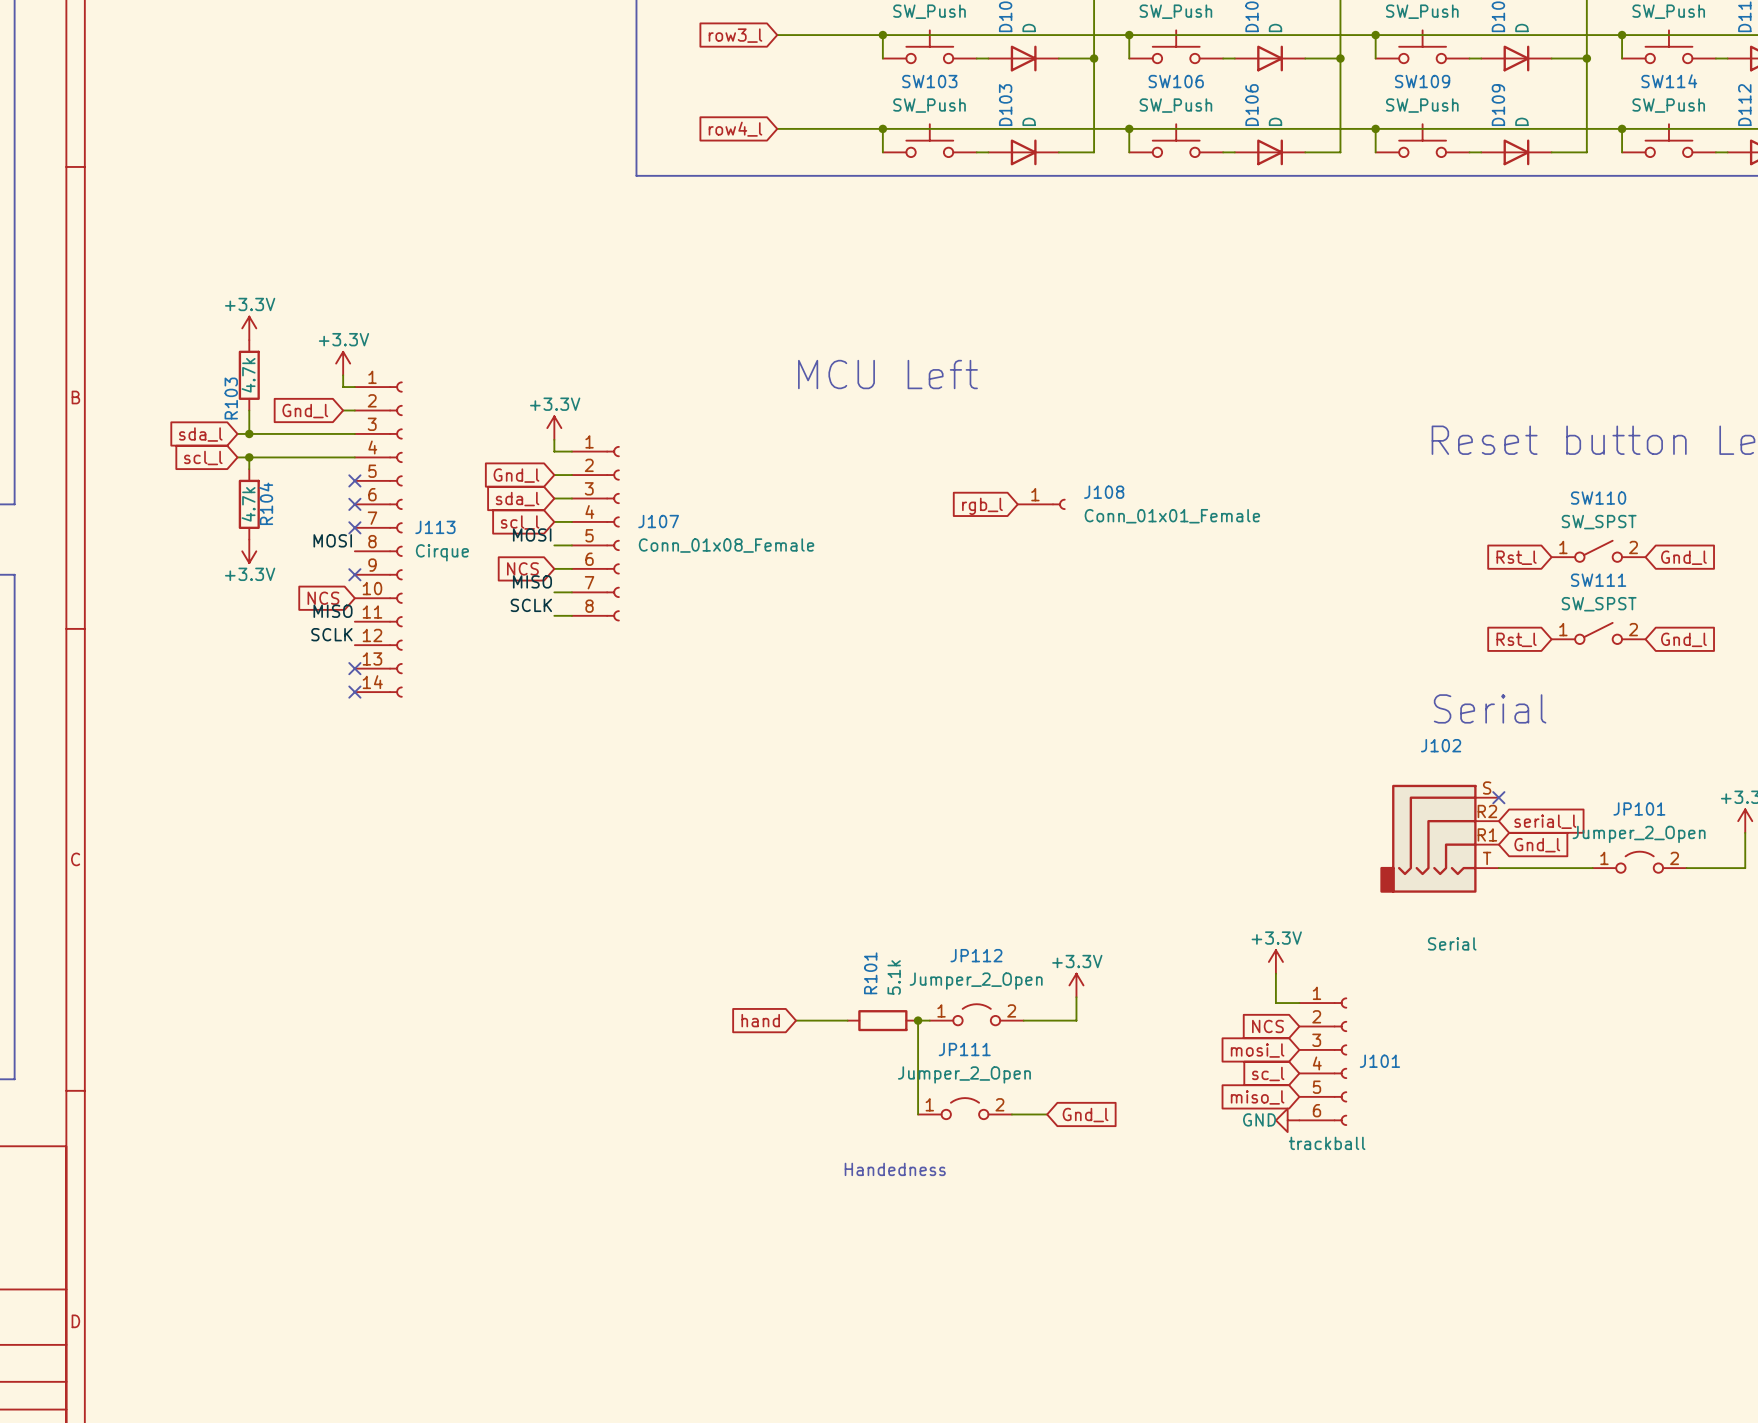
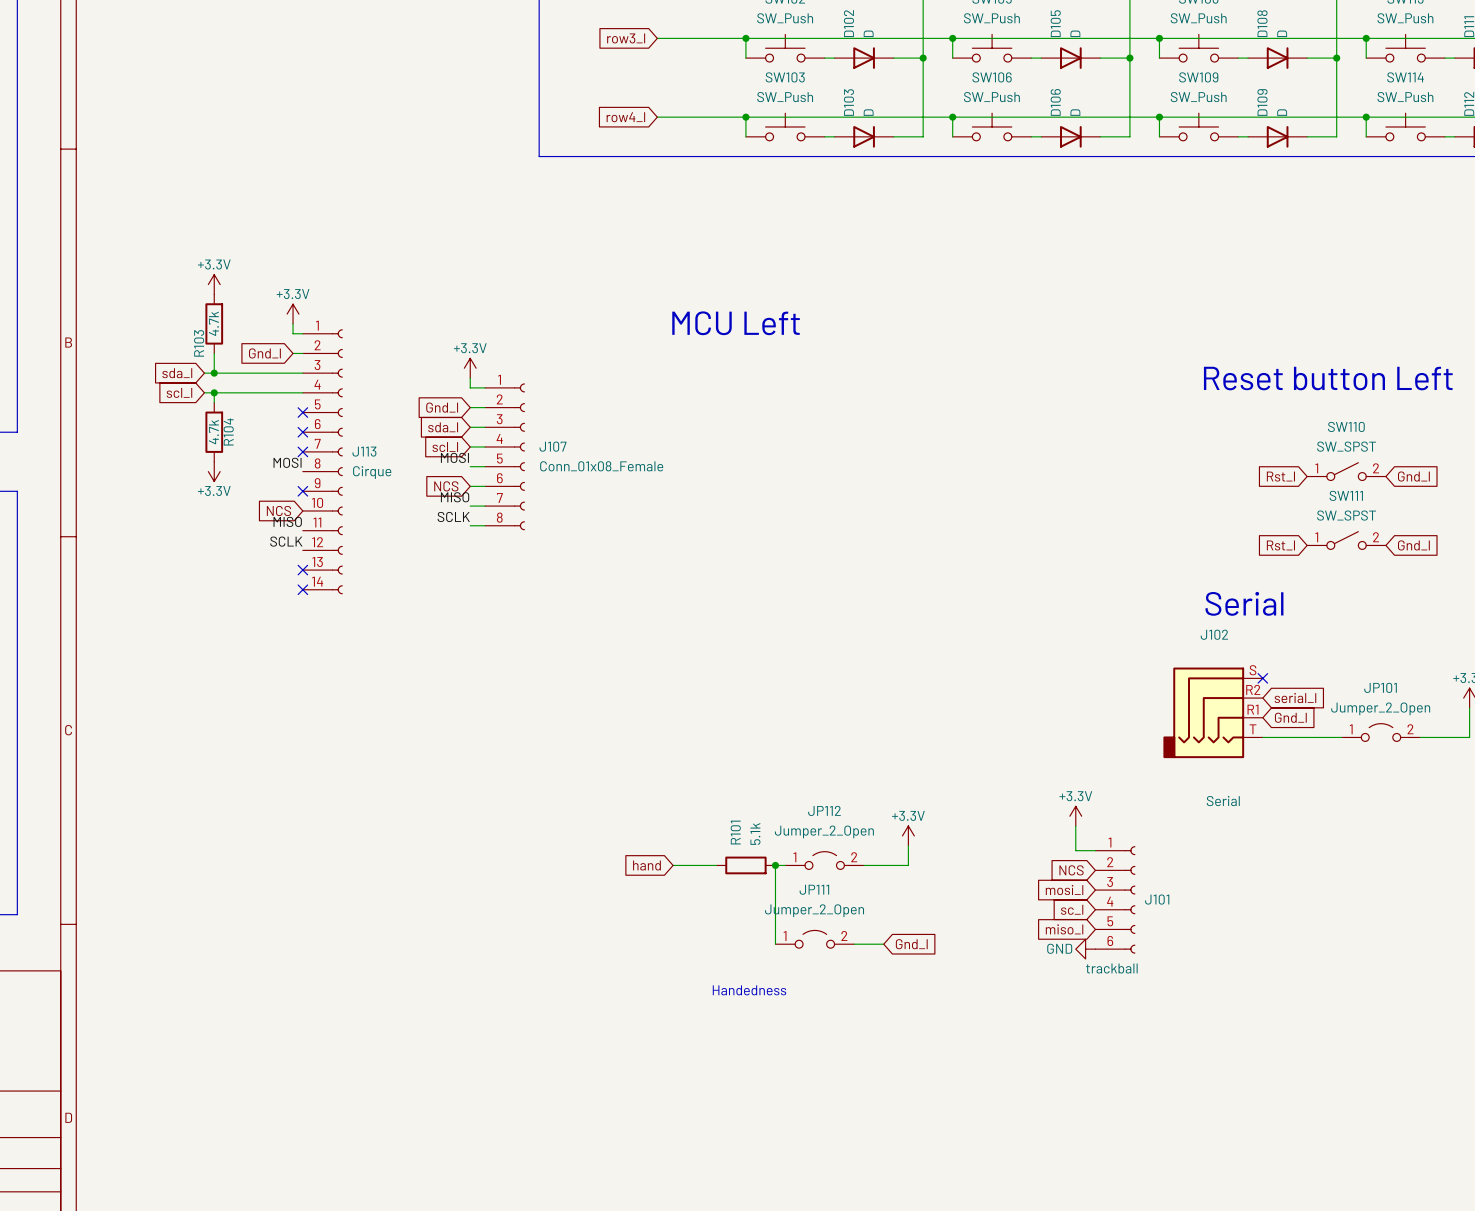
J108: Conn_01x01_Female (1041, 504) -> none
global label: rgb_l (982, 506) -> none

